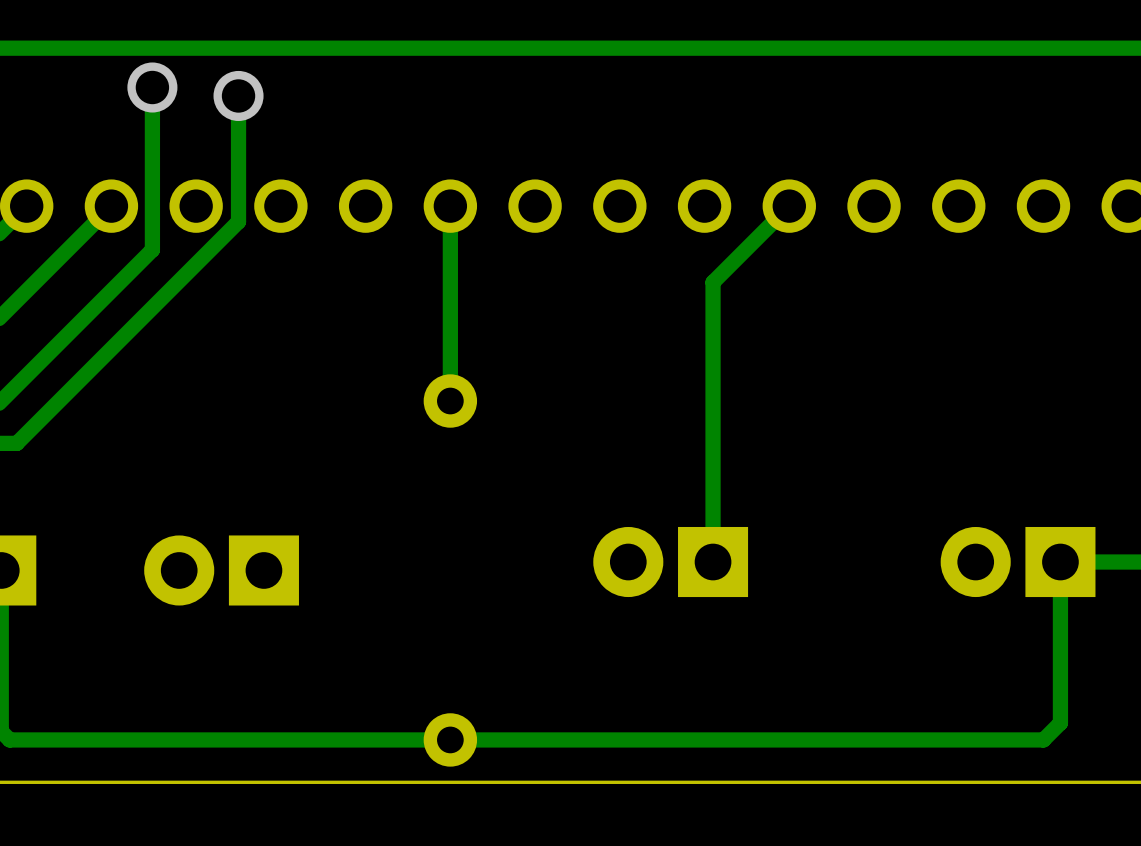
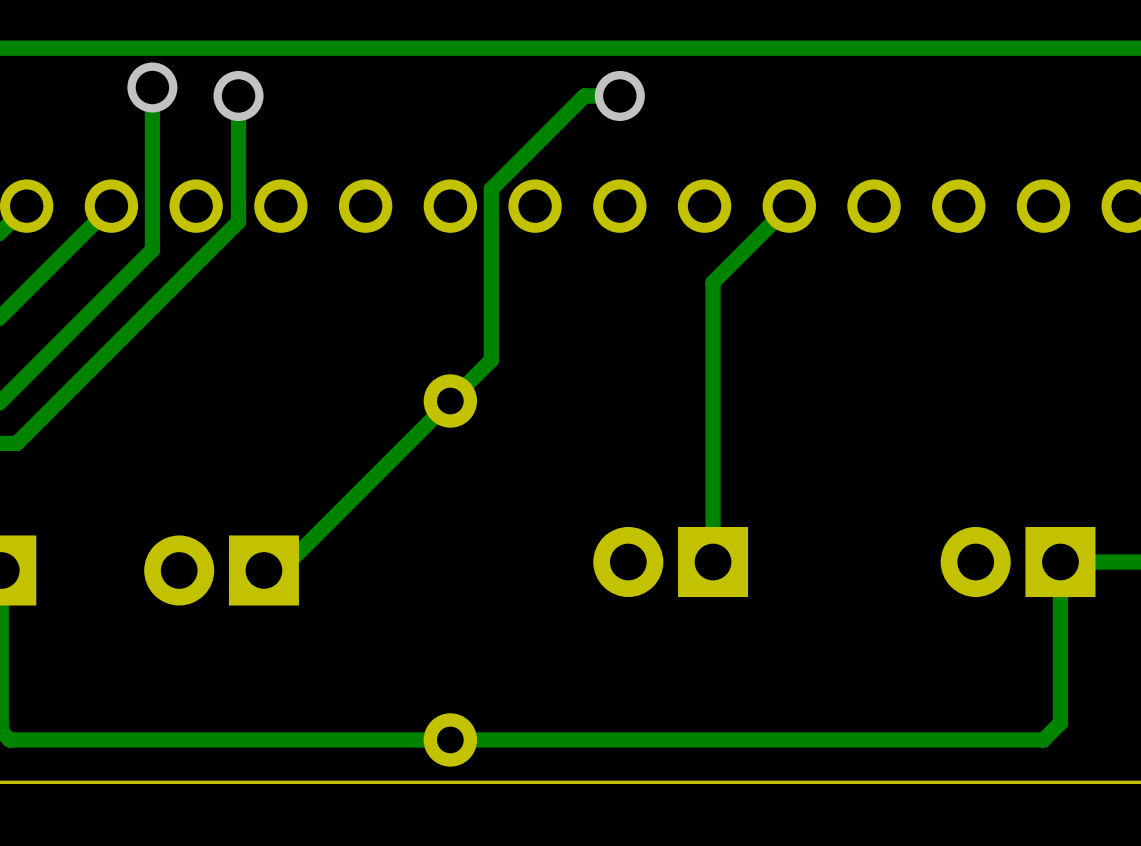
track: none -> (619, 95) (584, 95) (491, 189) (491, 360) (280, 570) (263, 570)
via: none -> (619, 95)
track: (450, 206) (450, 401) -> none

